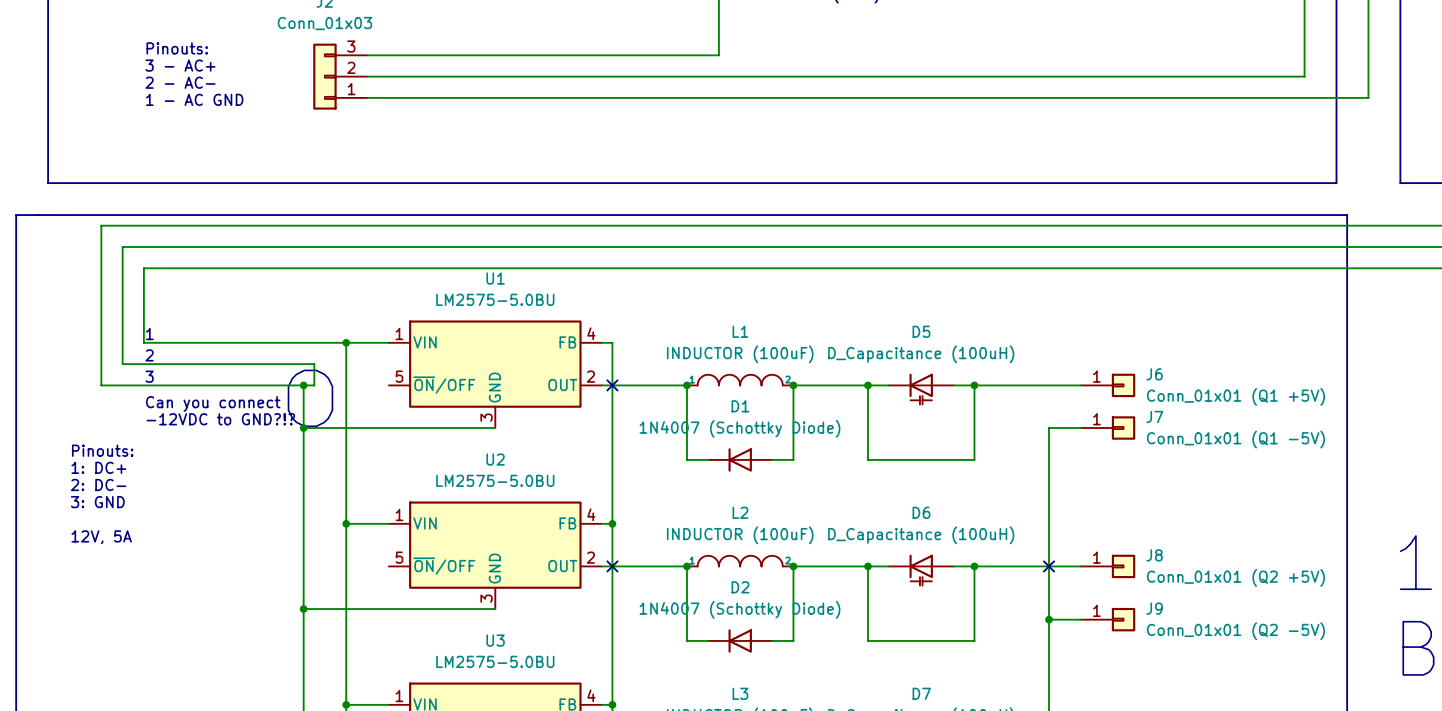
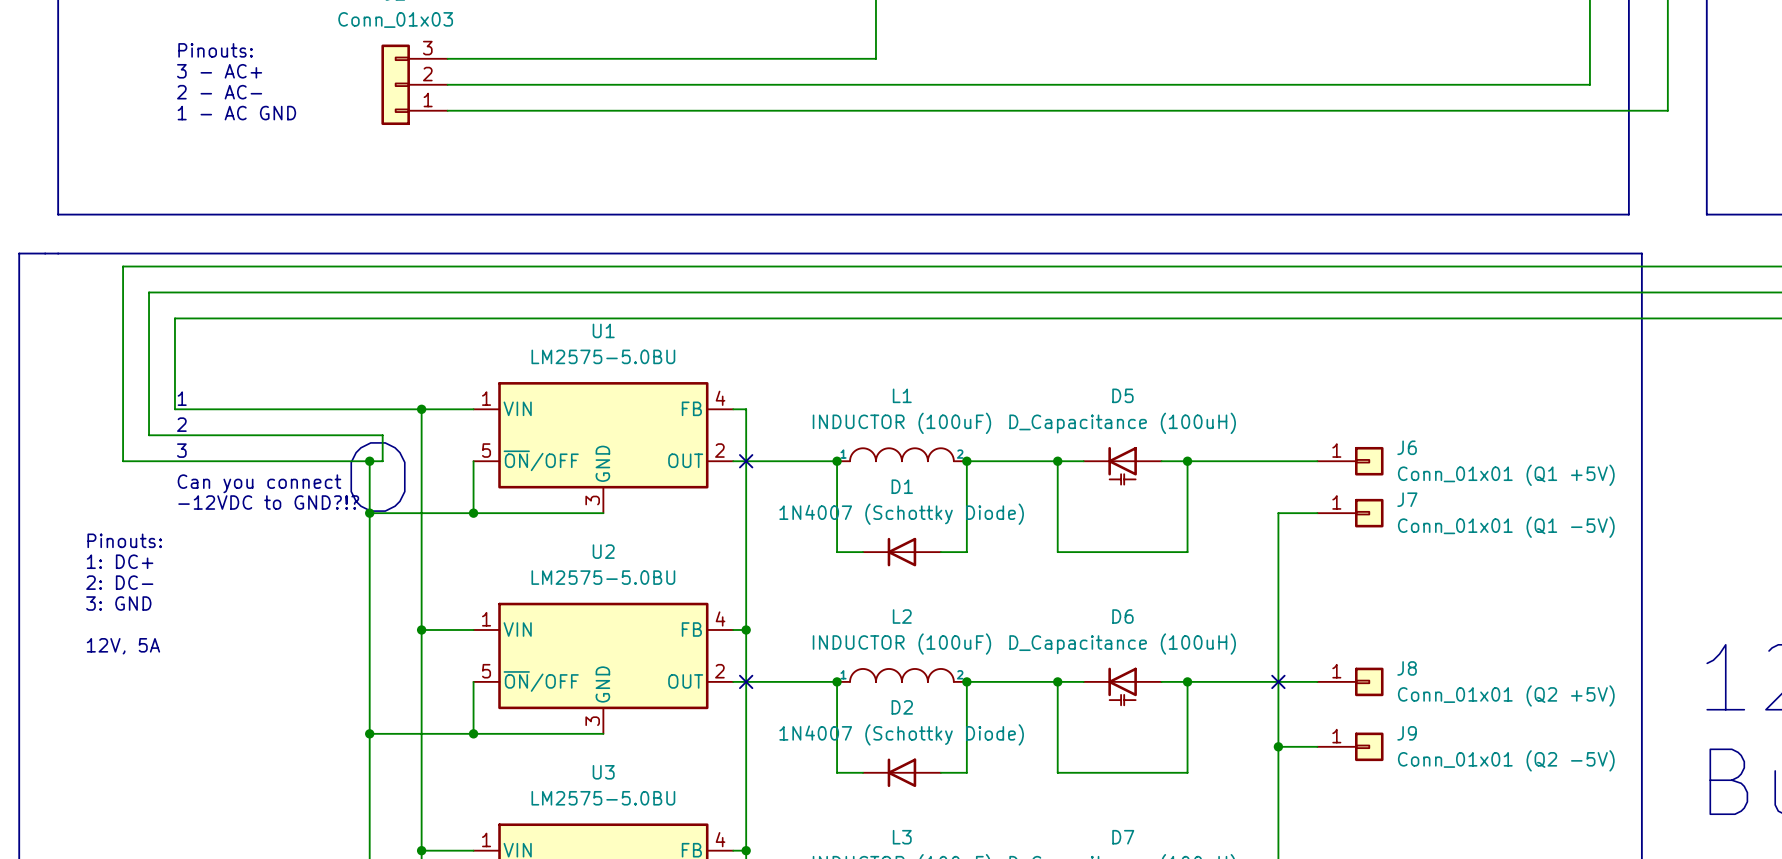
wire: none -> (473, 461) (473, 513)
junction: none -> (473, 513)
wire: none -> (473, 681) (473, 733)
junction: none -> (473, 733)

